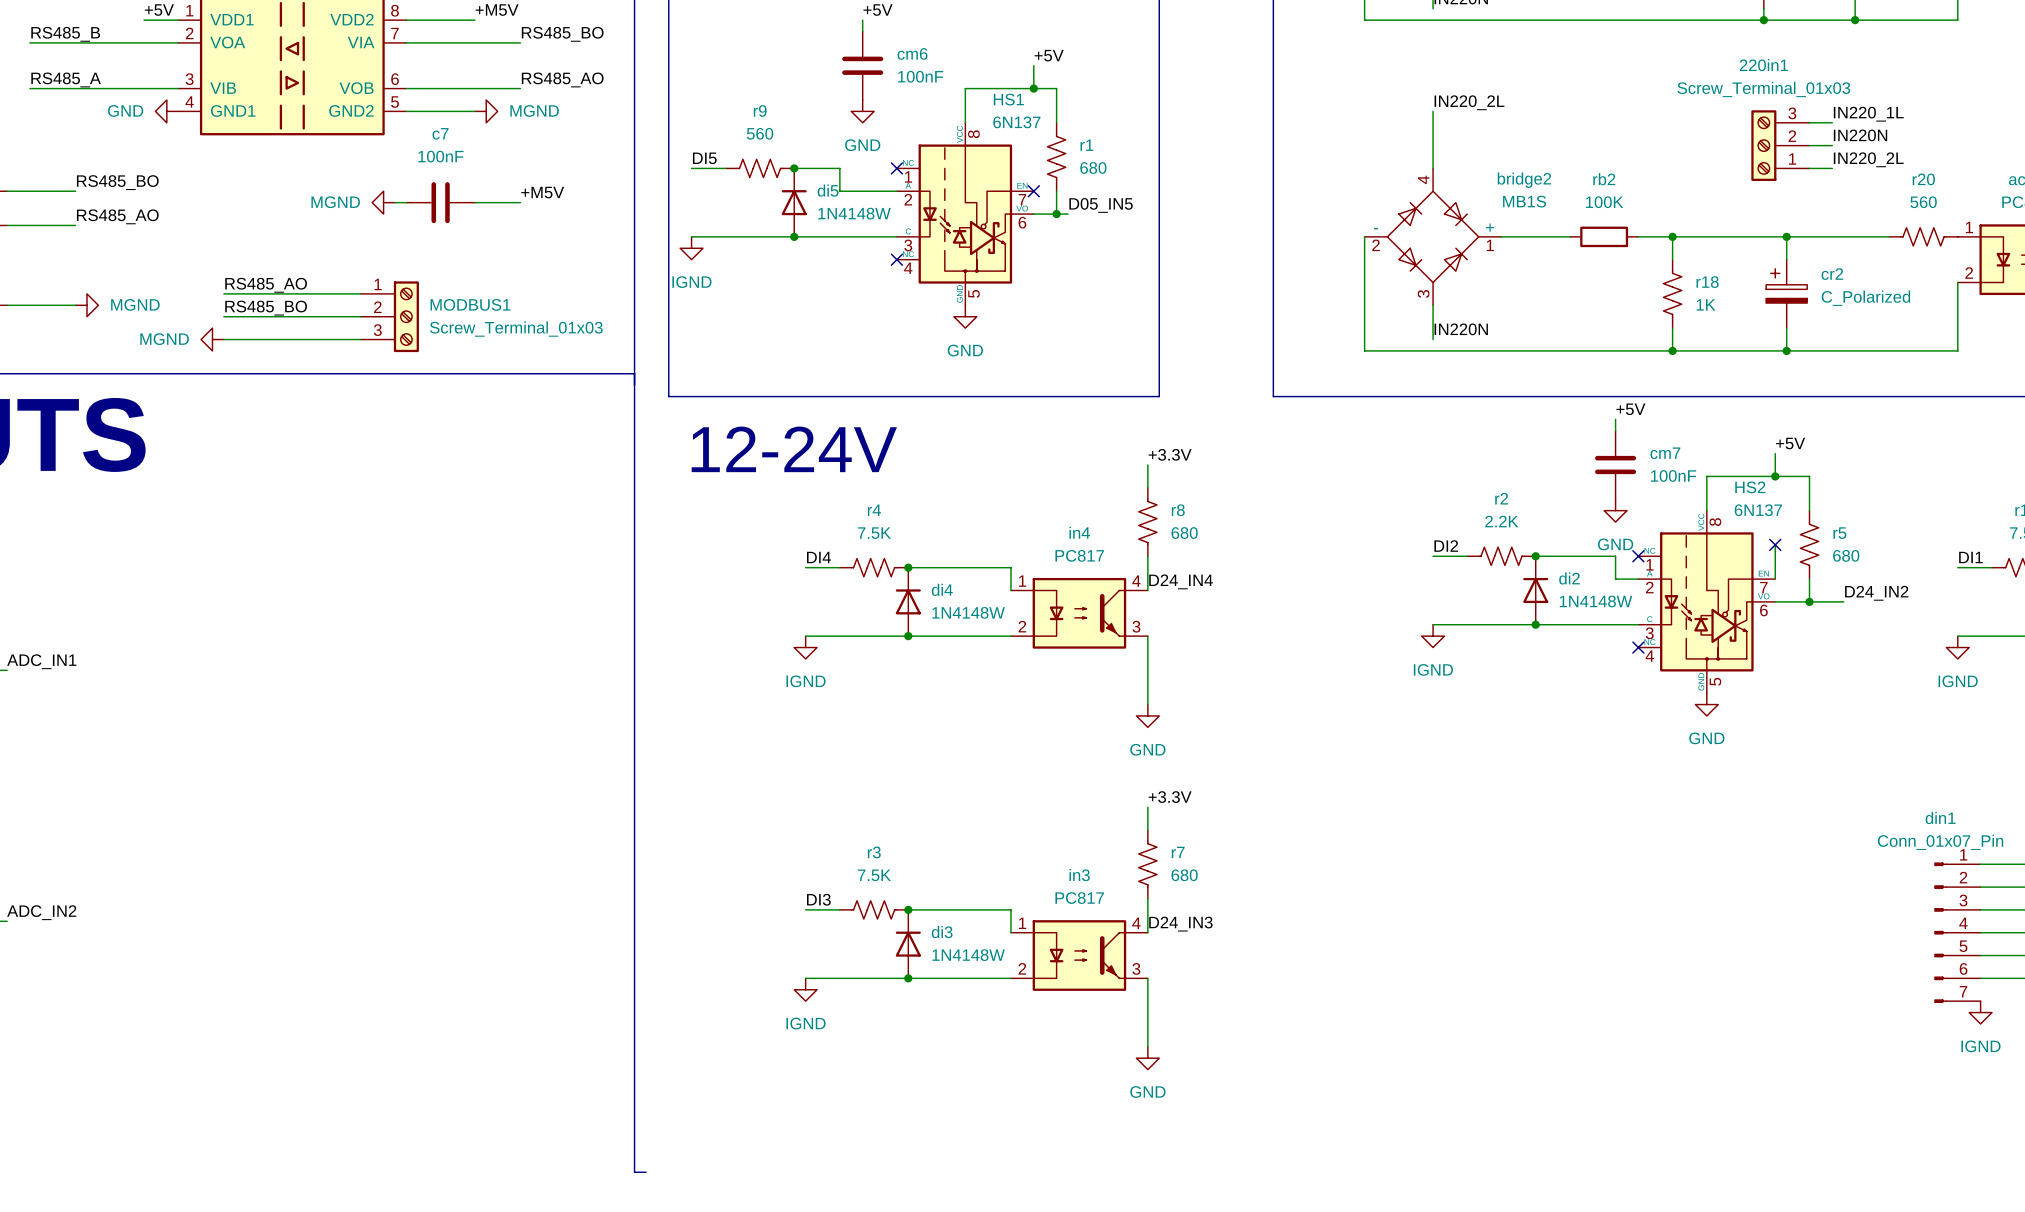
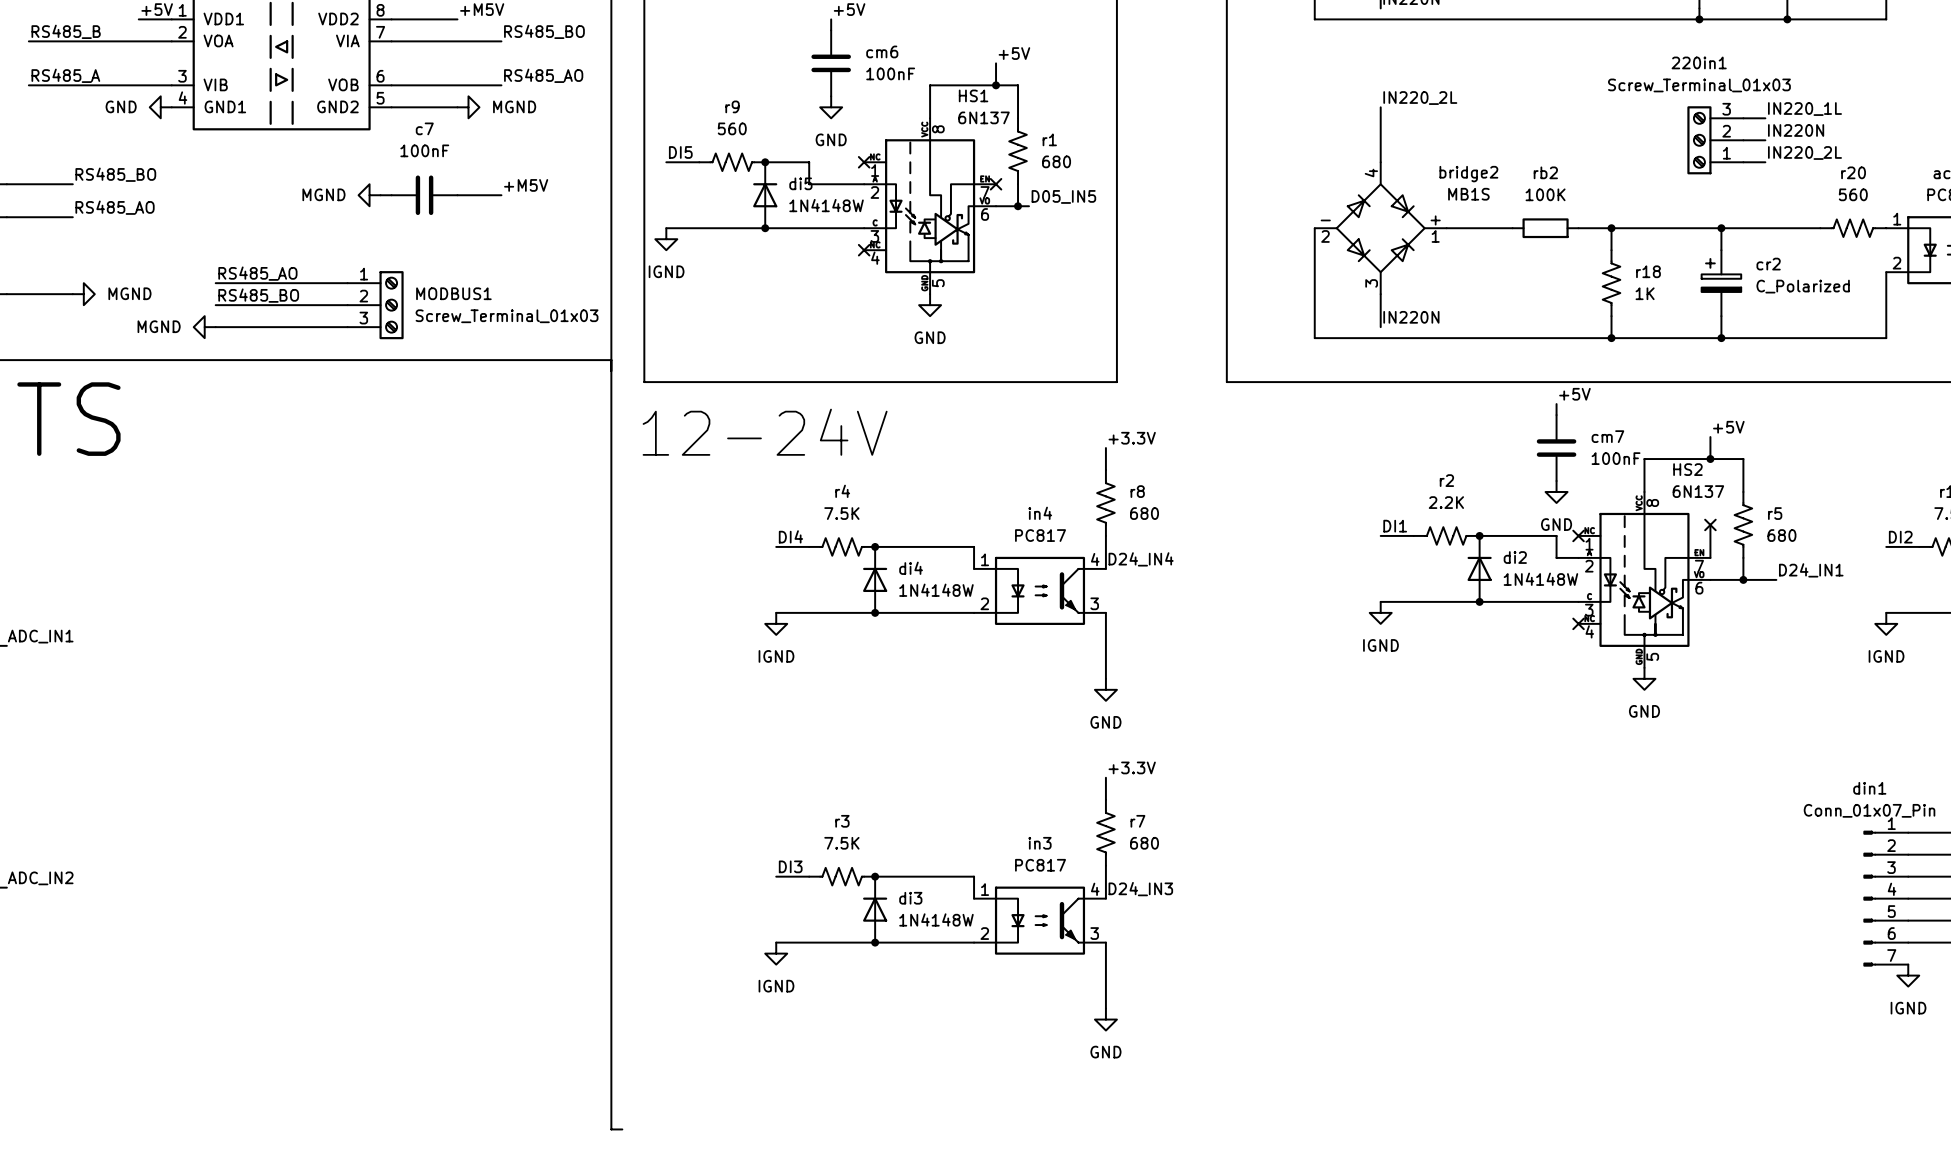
label: DI2 (1446, 546) -> DI1 (1395, 526)
label: DI1 (1970, 557) -> DI2 (1900, 537)
label: D24_IN2 (1876, 593) -> D24_IN1 (1811, 570)

